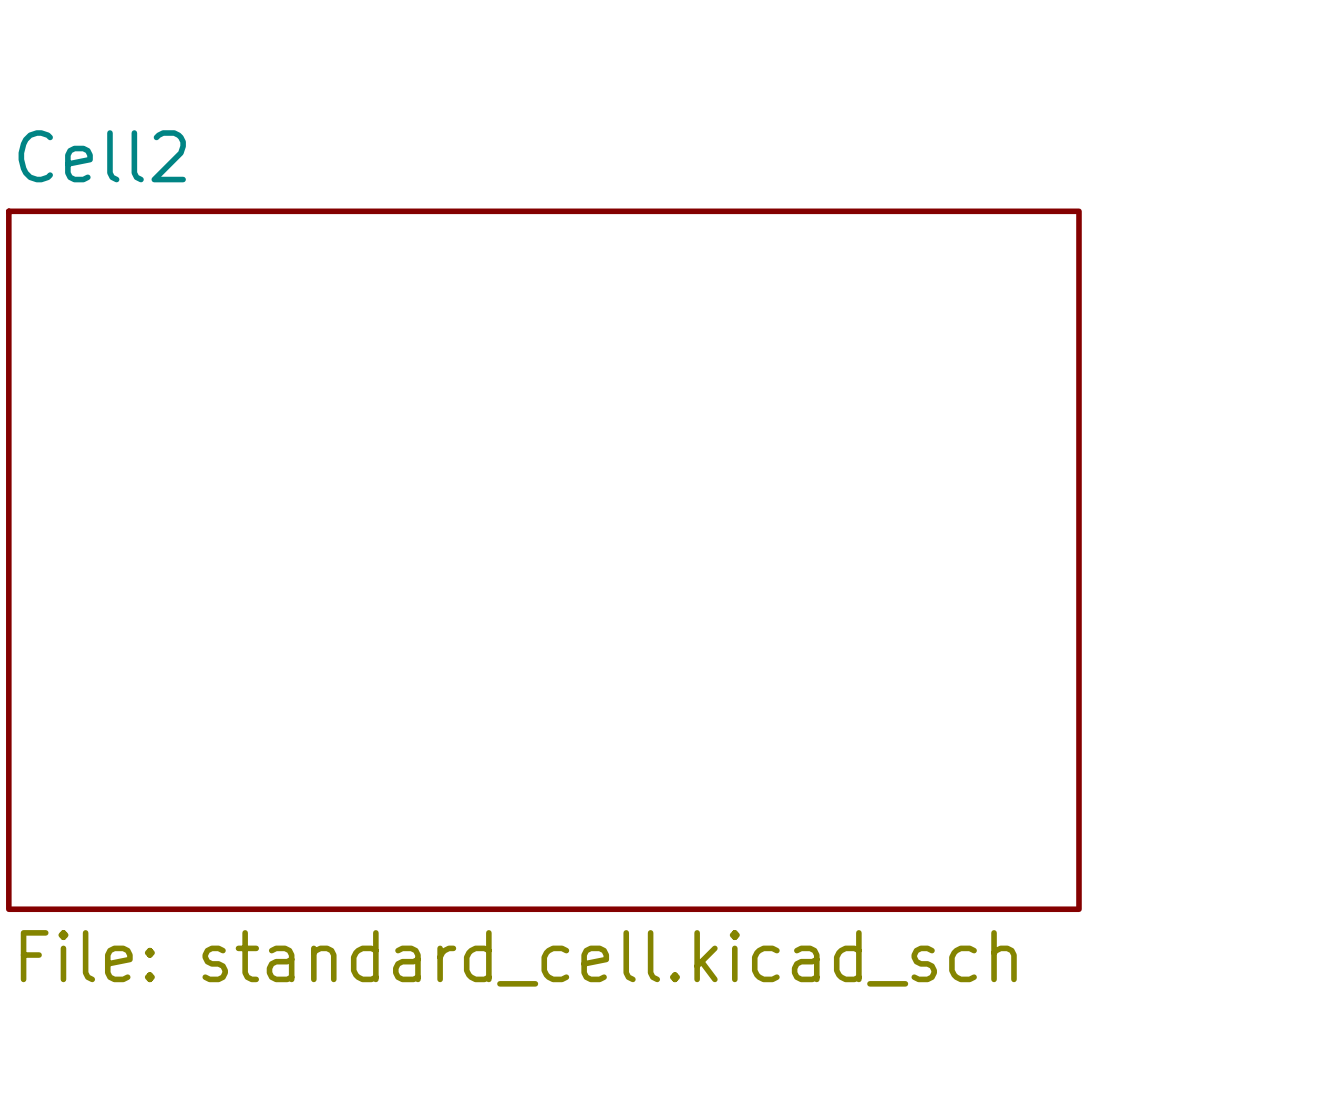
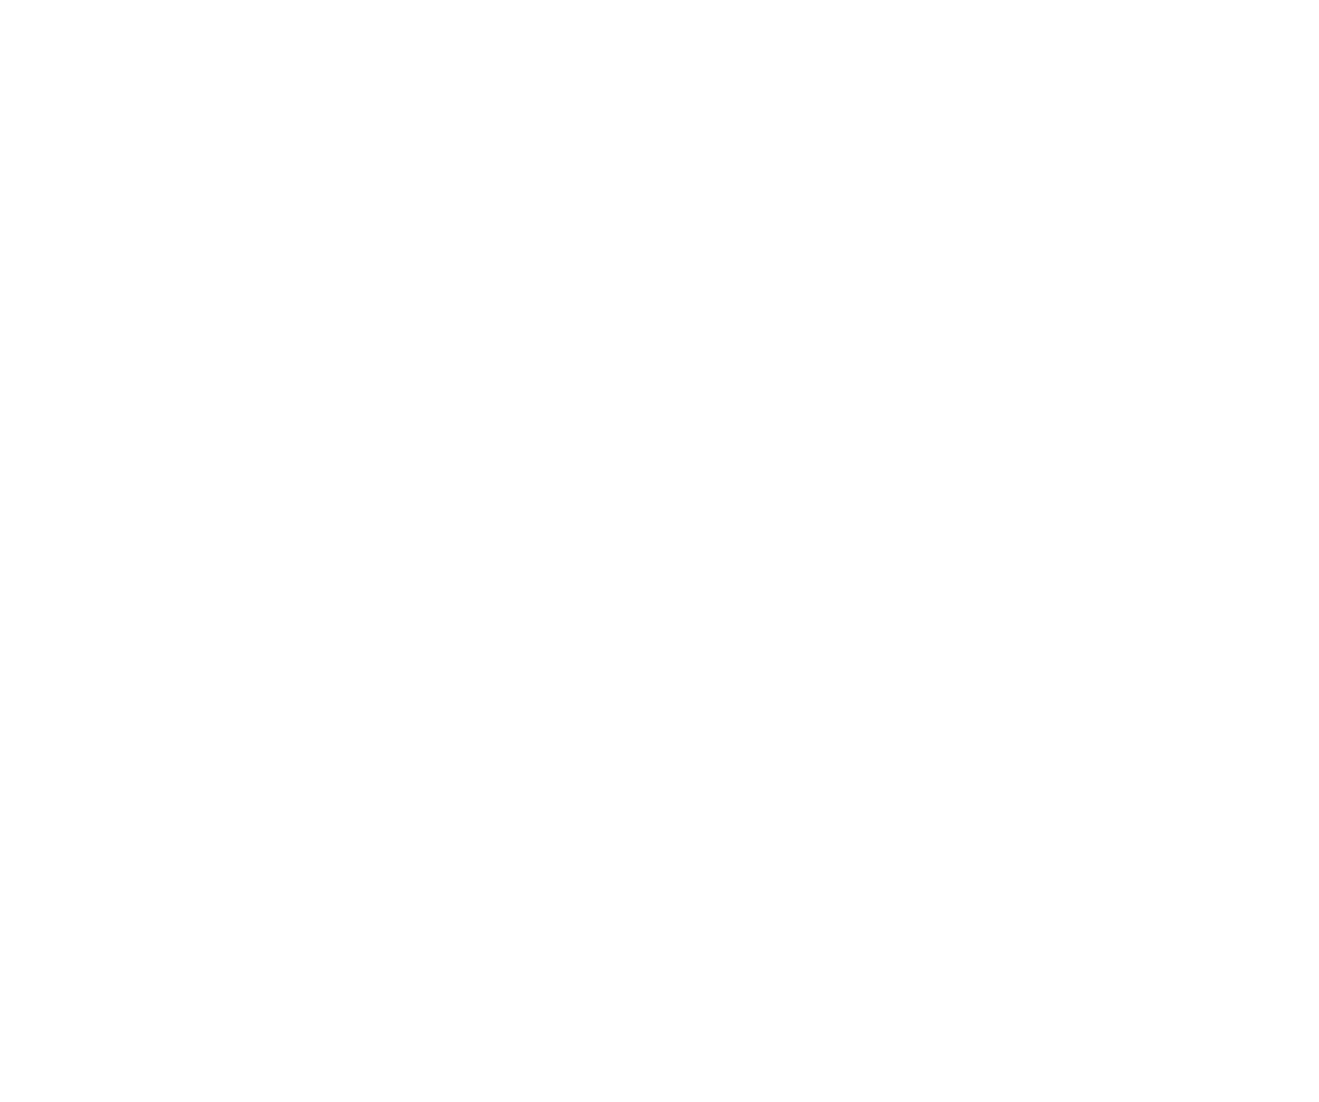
sheet Cell2: File: standard_cell.kicad_sch (543, 560) -> none

